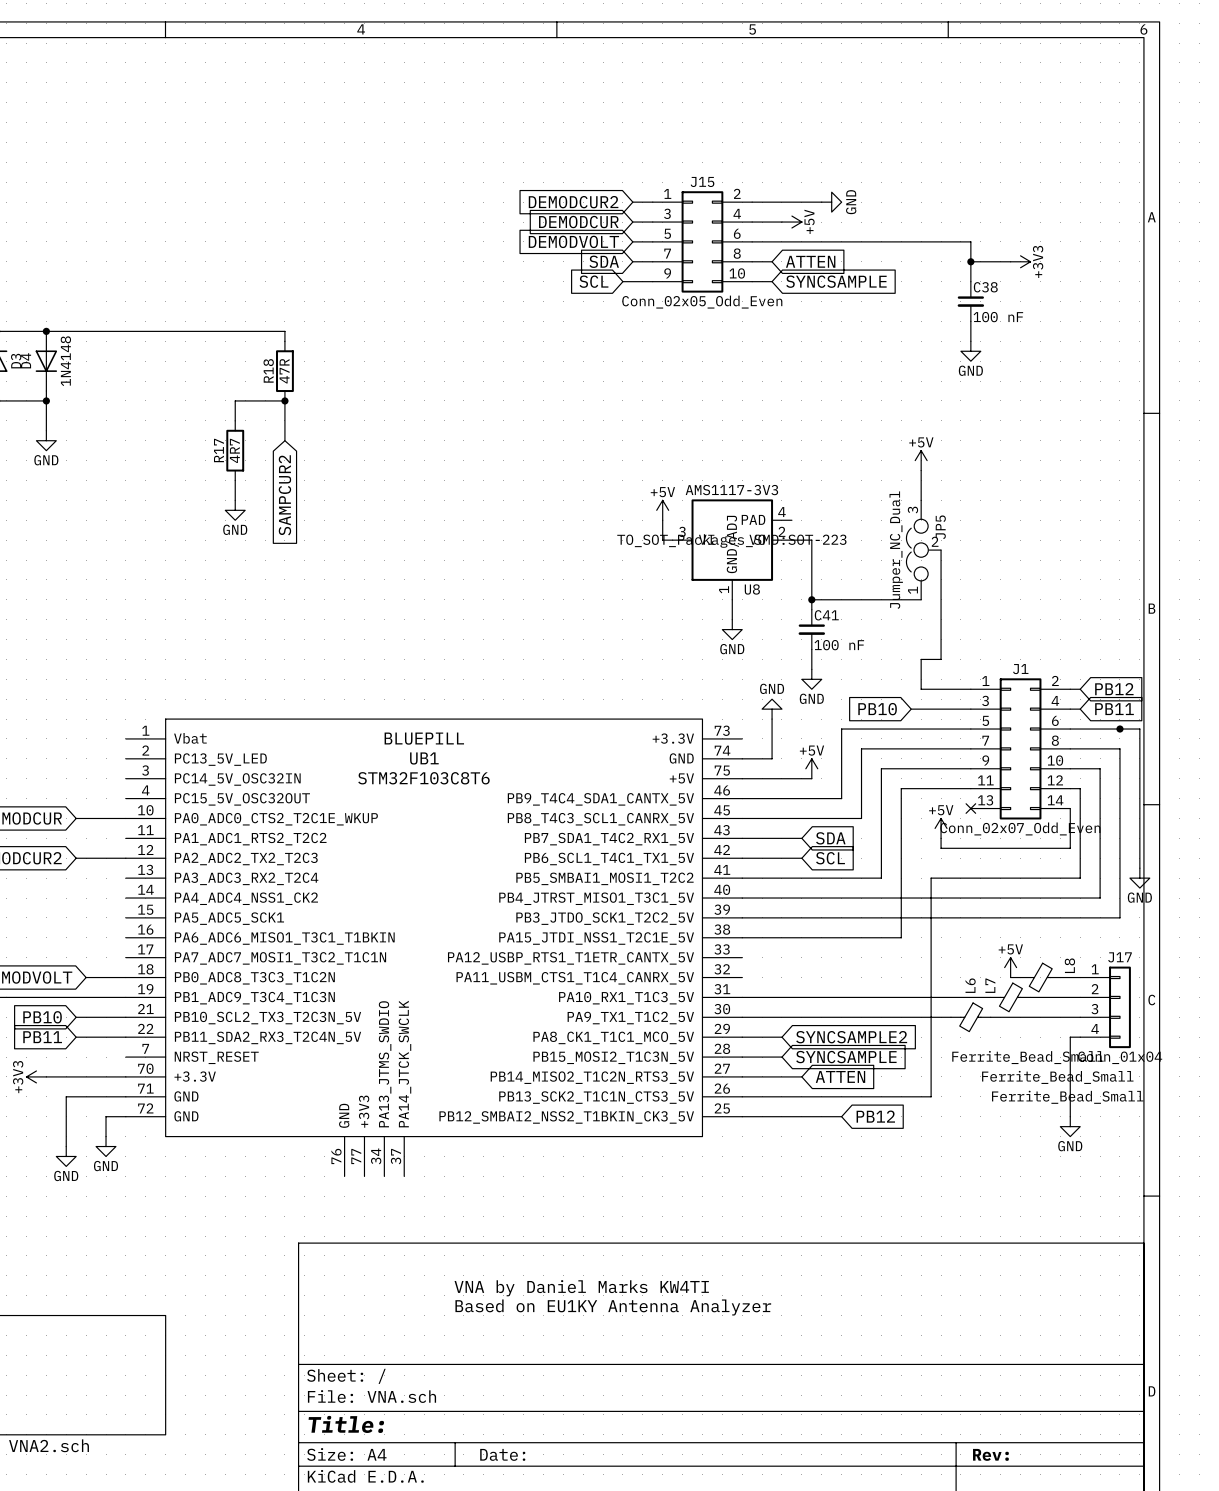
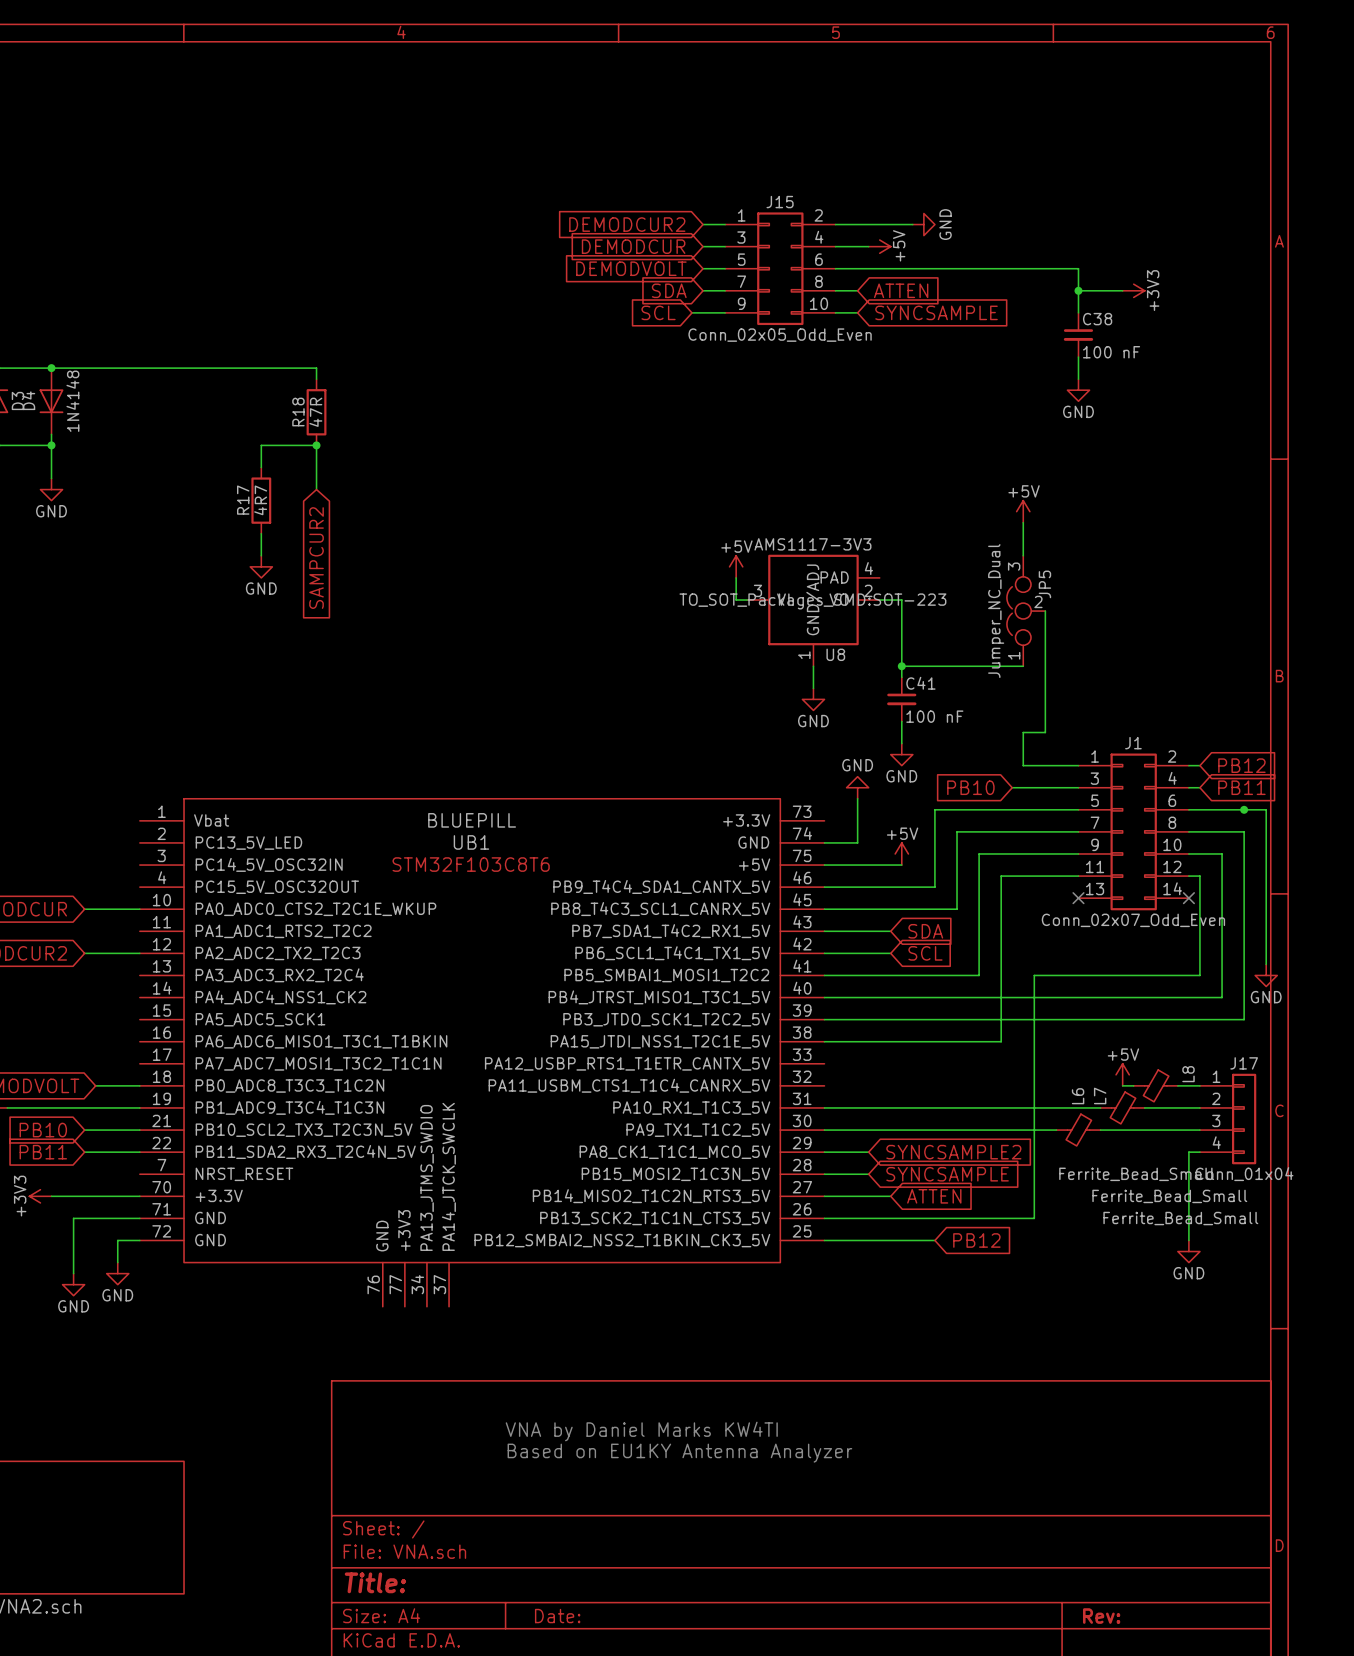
wire: (1070, 808) (1070, 848) (941, 848) (941, 838) -> none
no-connect mark: none -> (1188, 898)
power symbol: +5V (941, 828) -> none

